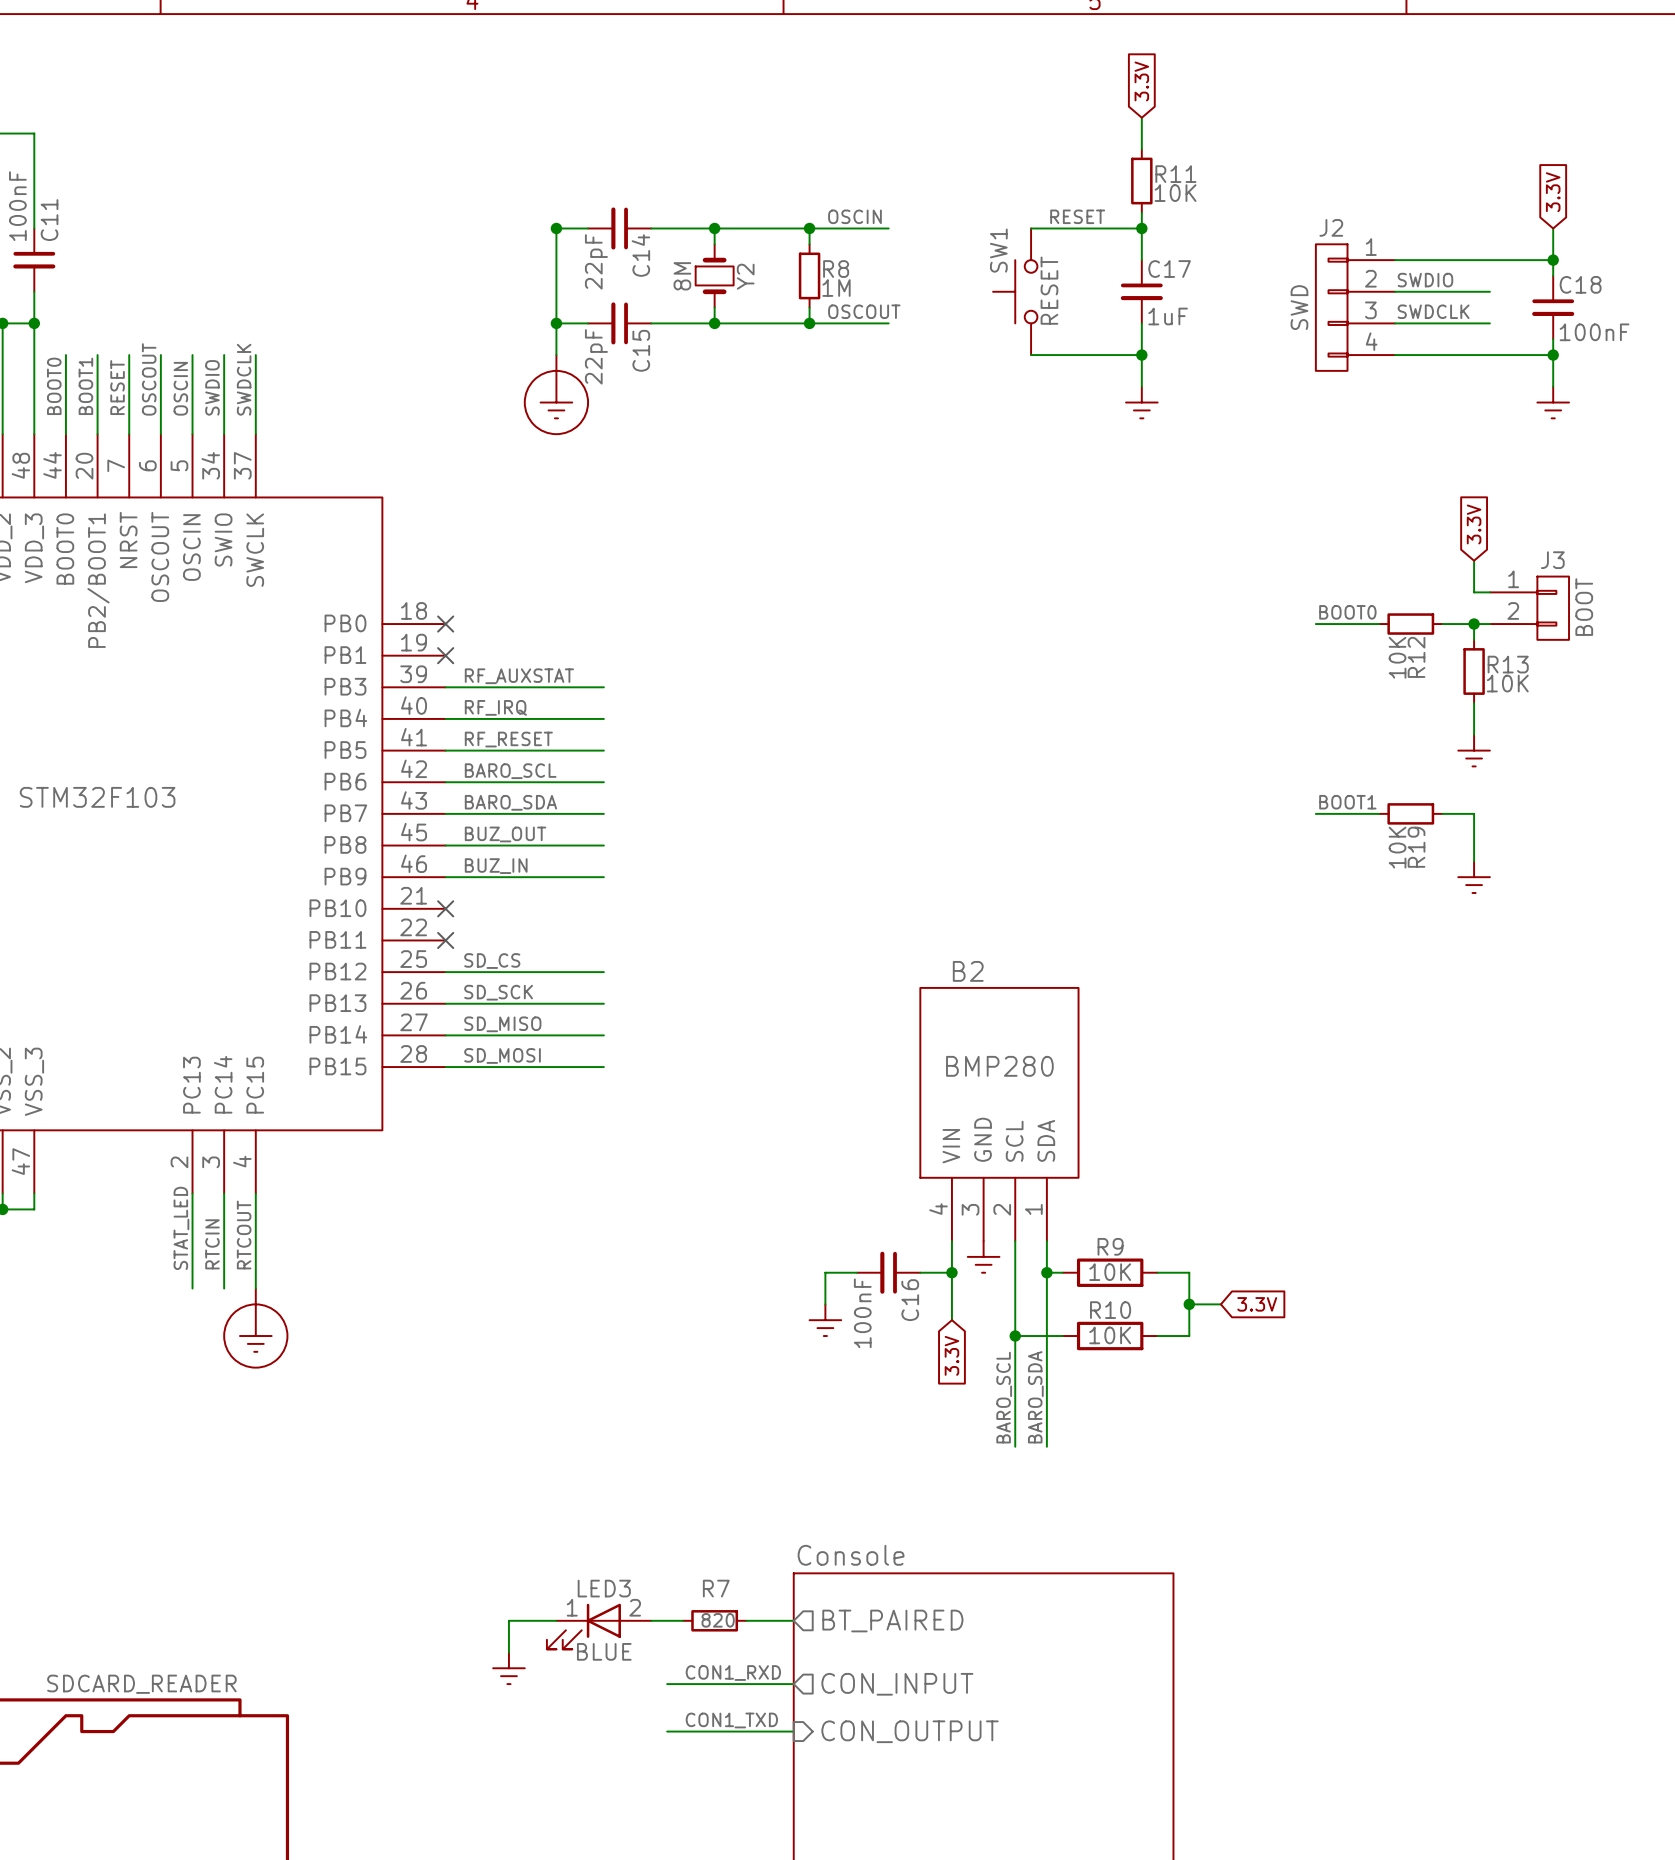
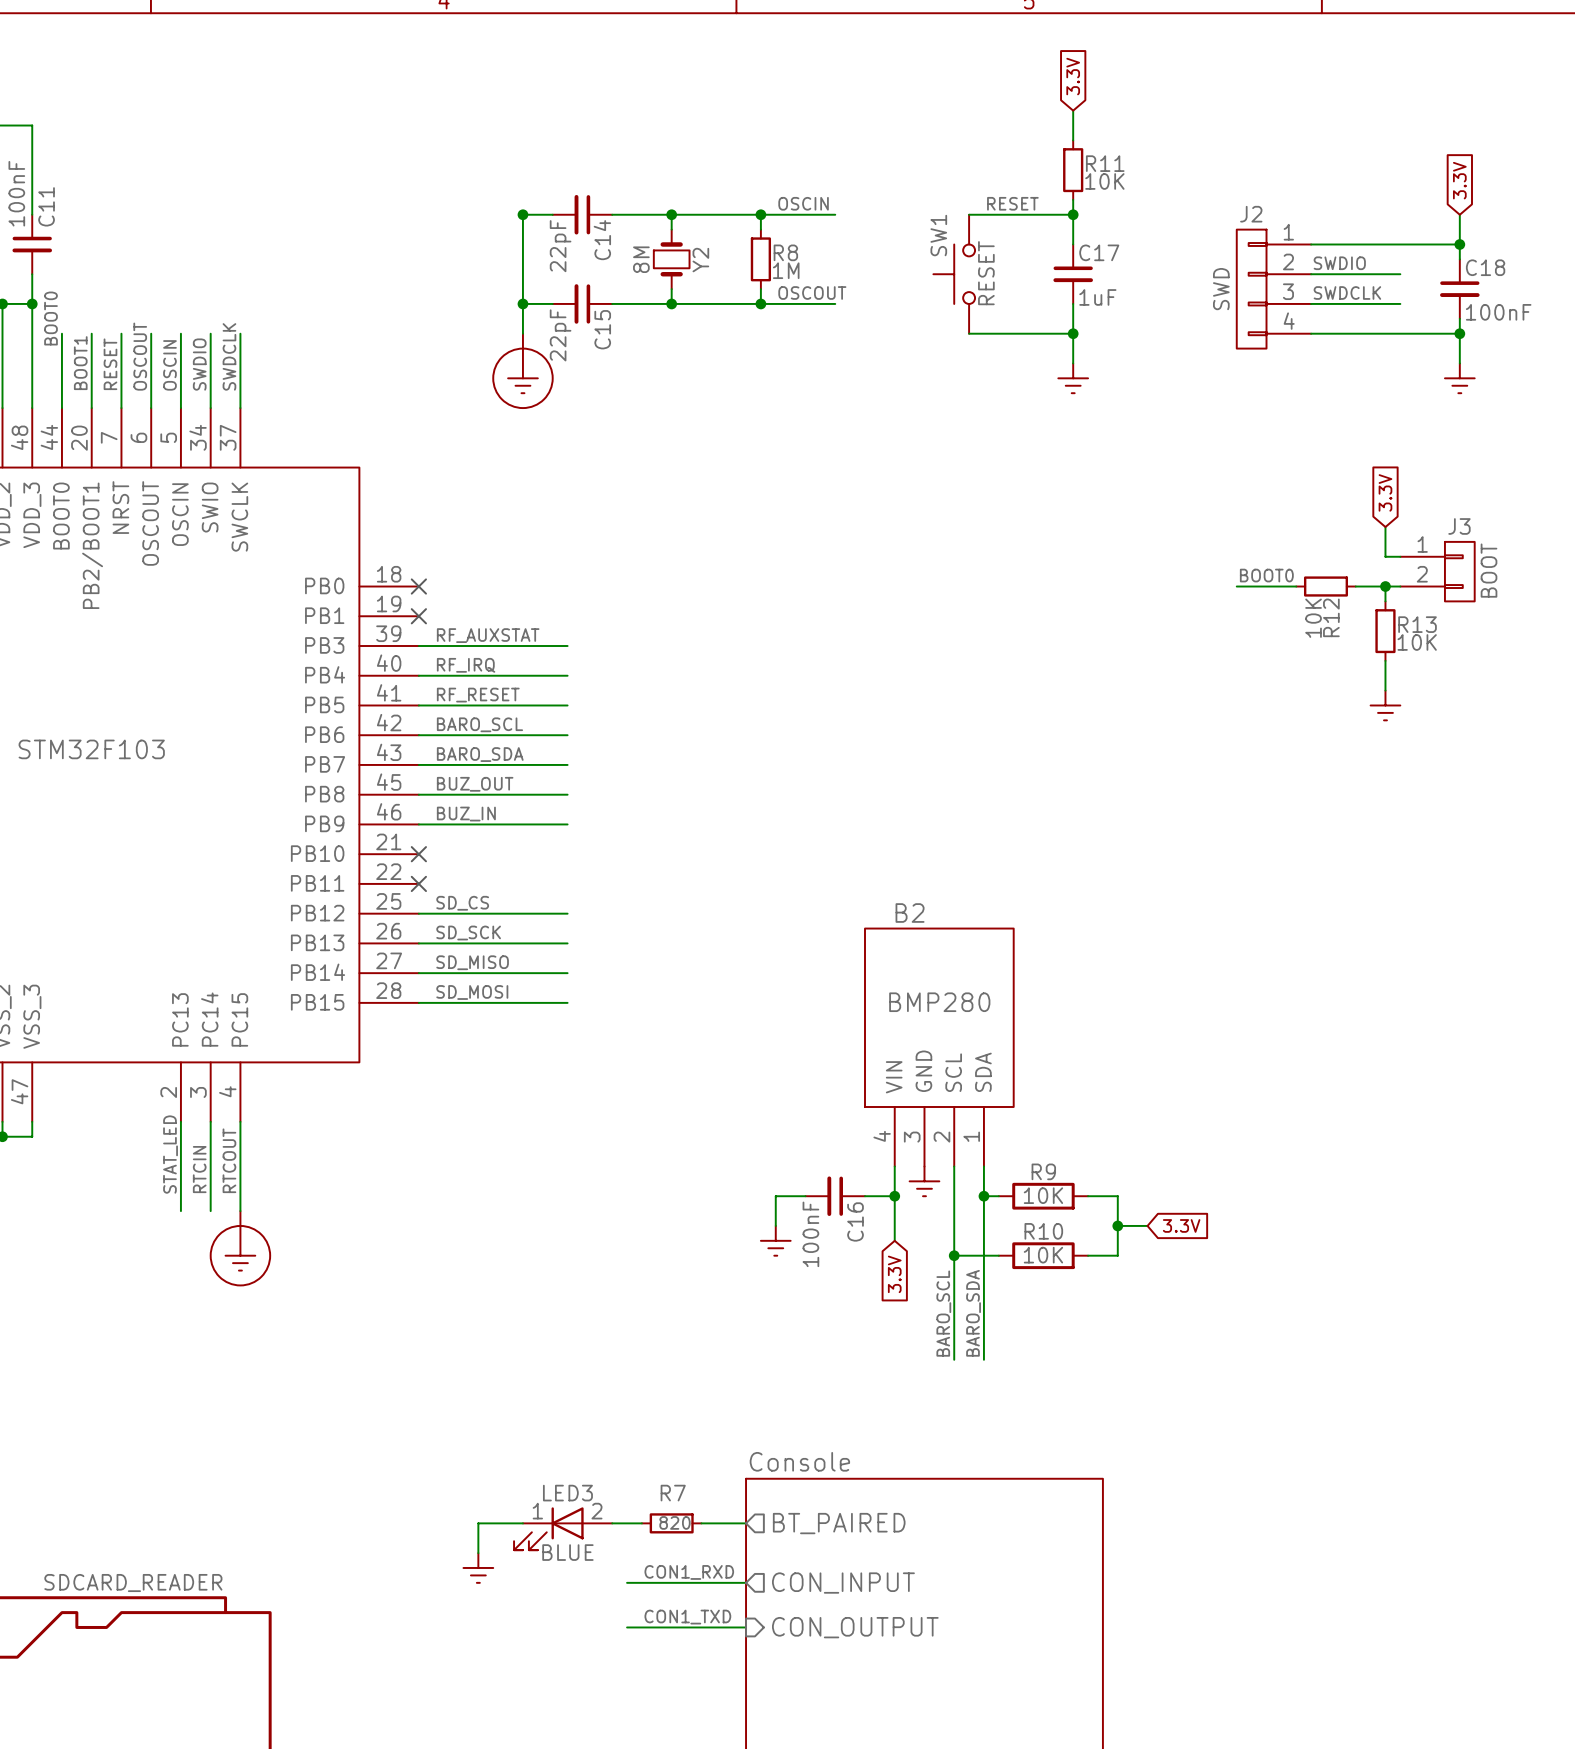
label position: BOOT0 (54, 386) -> BOOT0 (51, 318)
label: BOOT1 (1347, 802) -> none
wire: (1315, 813) (1379, 813) -> none
R19: 10K (1410, 813) -> none
wire: (1442, 813) (1474, 813) (1474, 861) -> none
power symbol: (1474, 877) -> none

